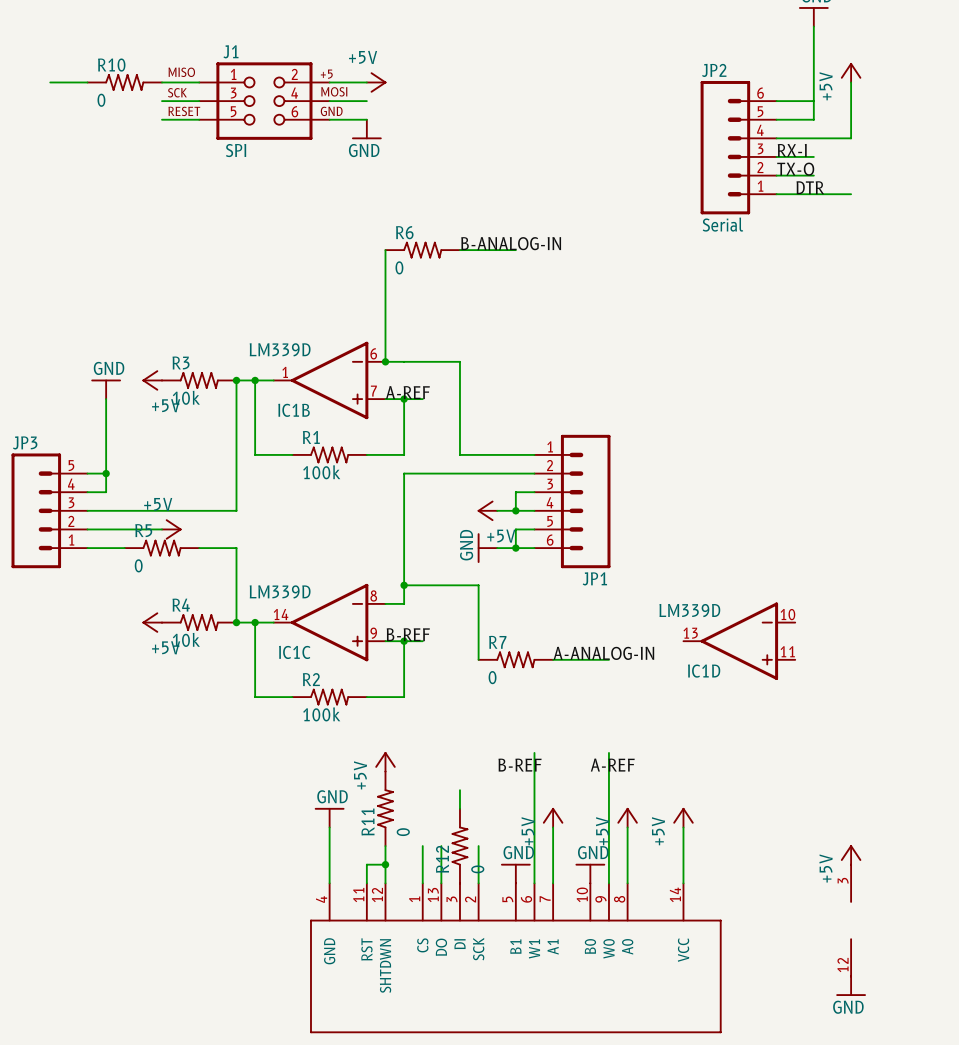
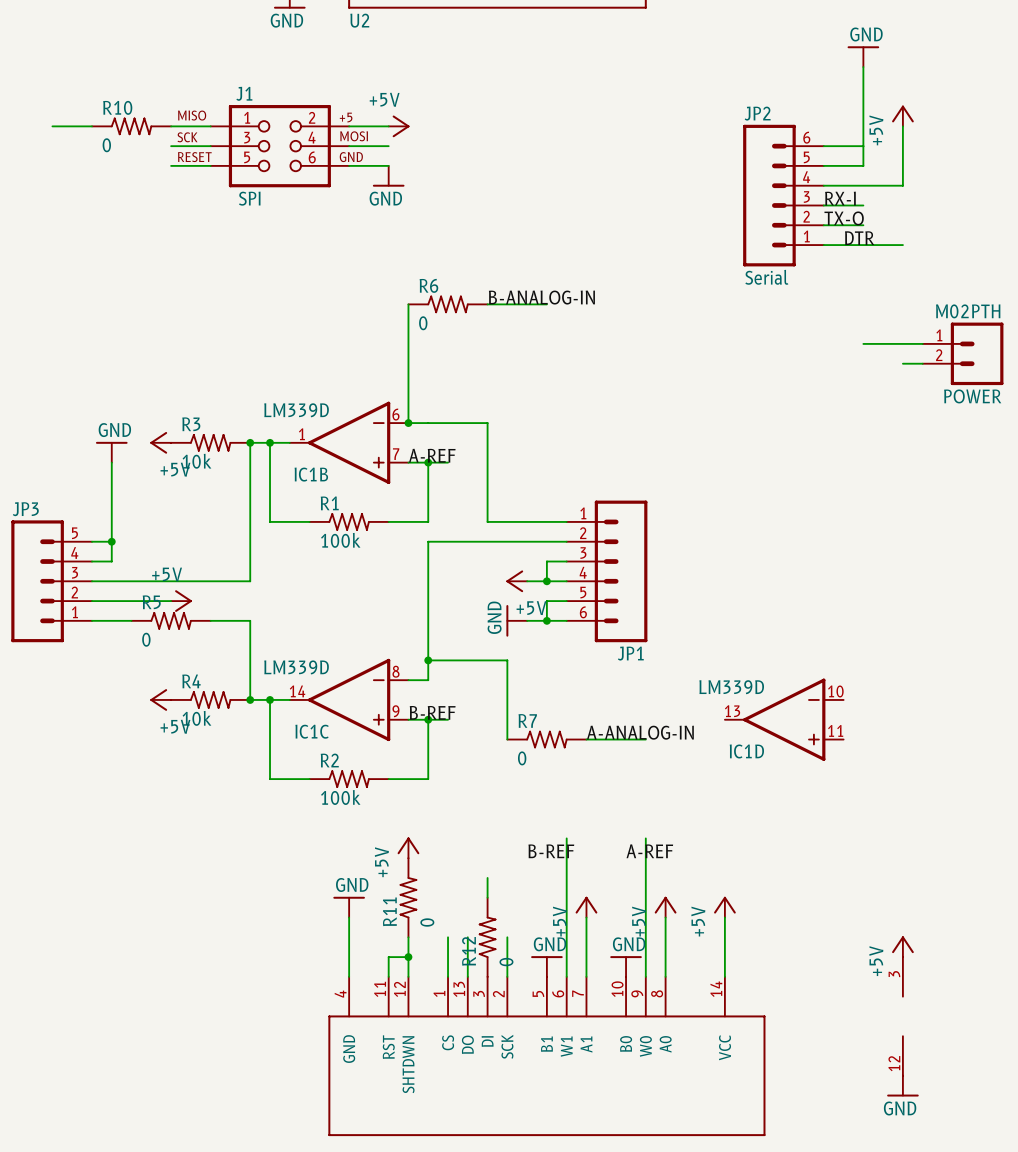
wire: none -> (863, 343) (922, 343)
POWER: none -> M02PTH (963, 353)
wire: none -> (902, 363) (922, 363)

